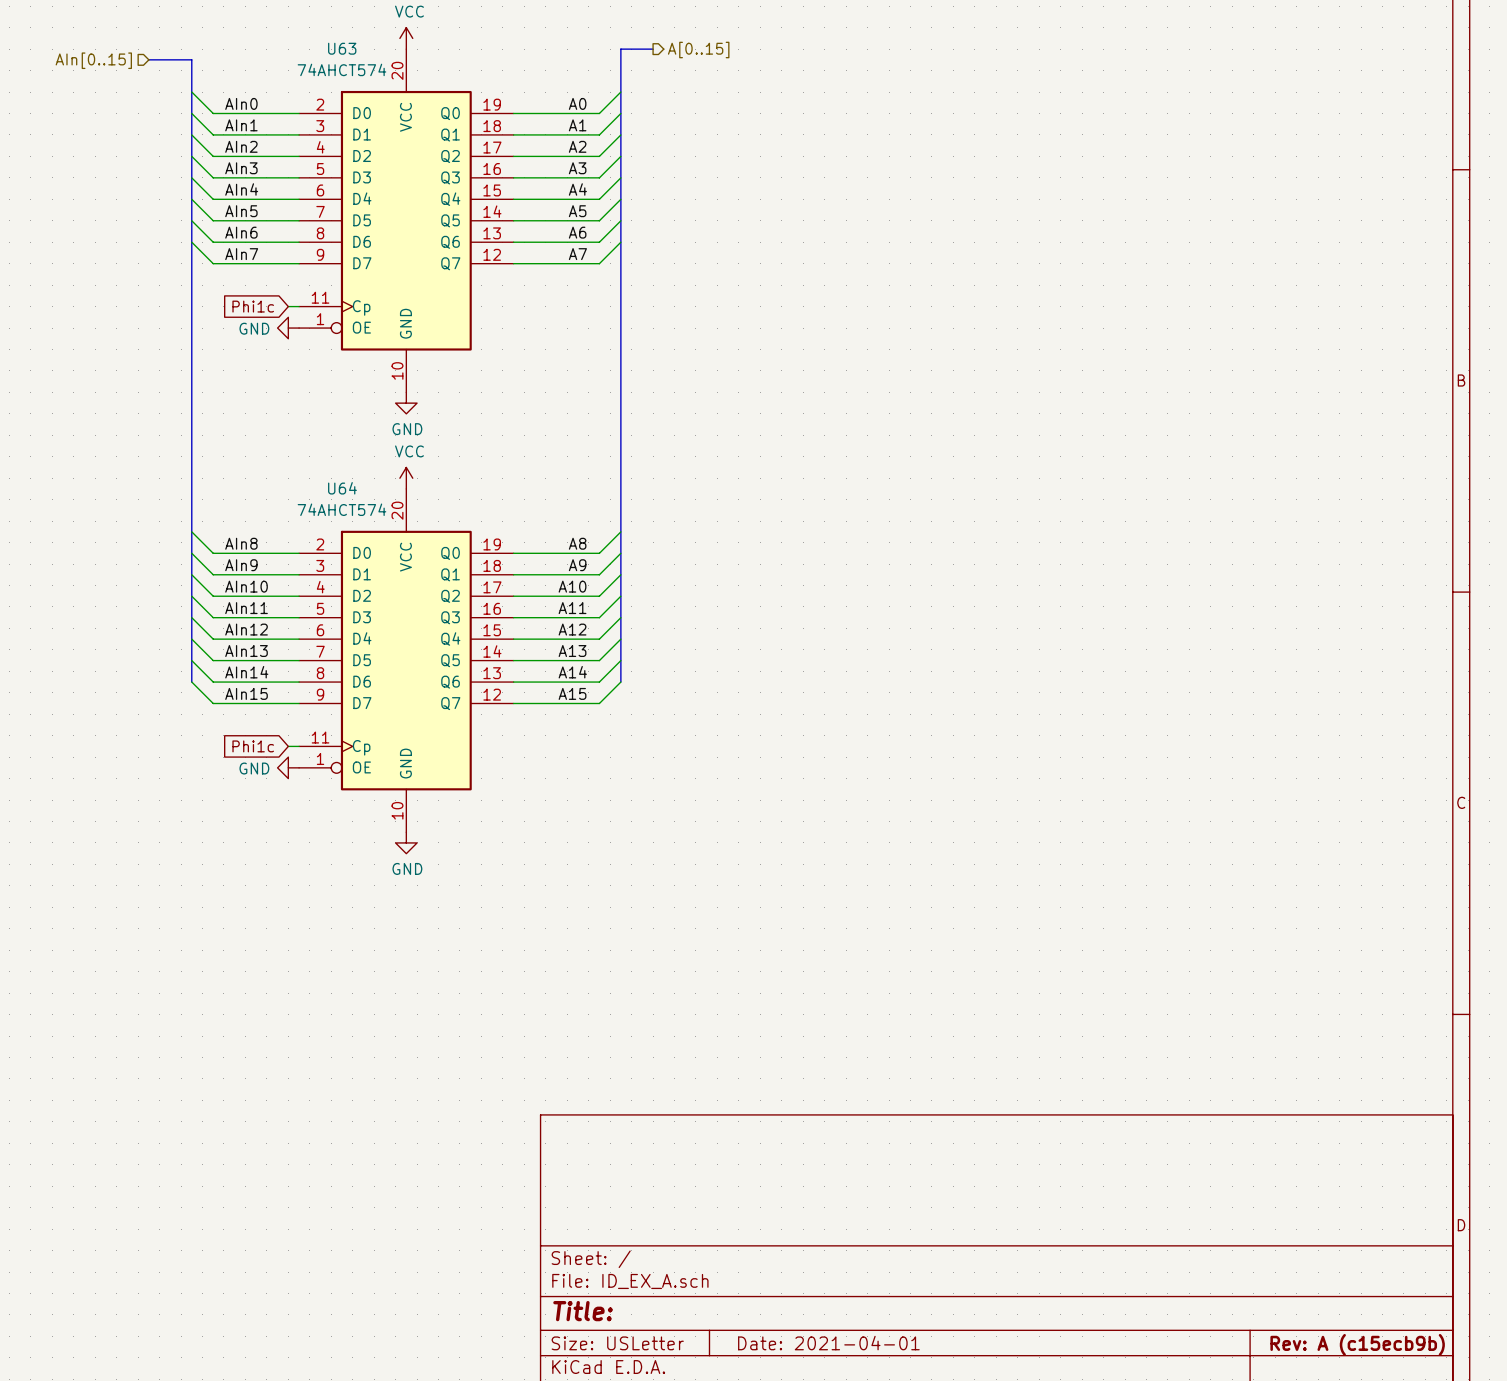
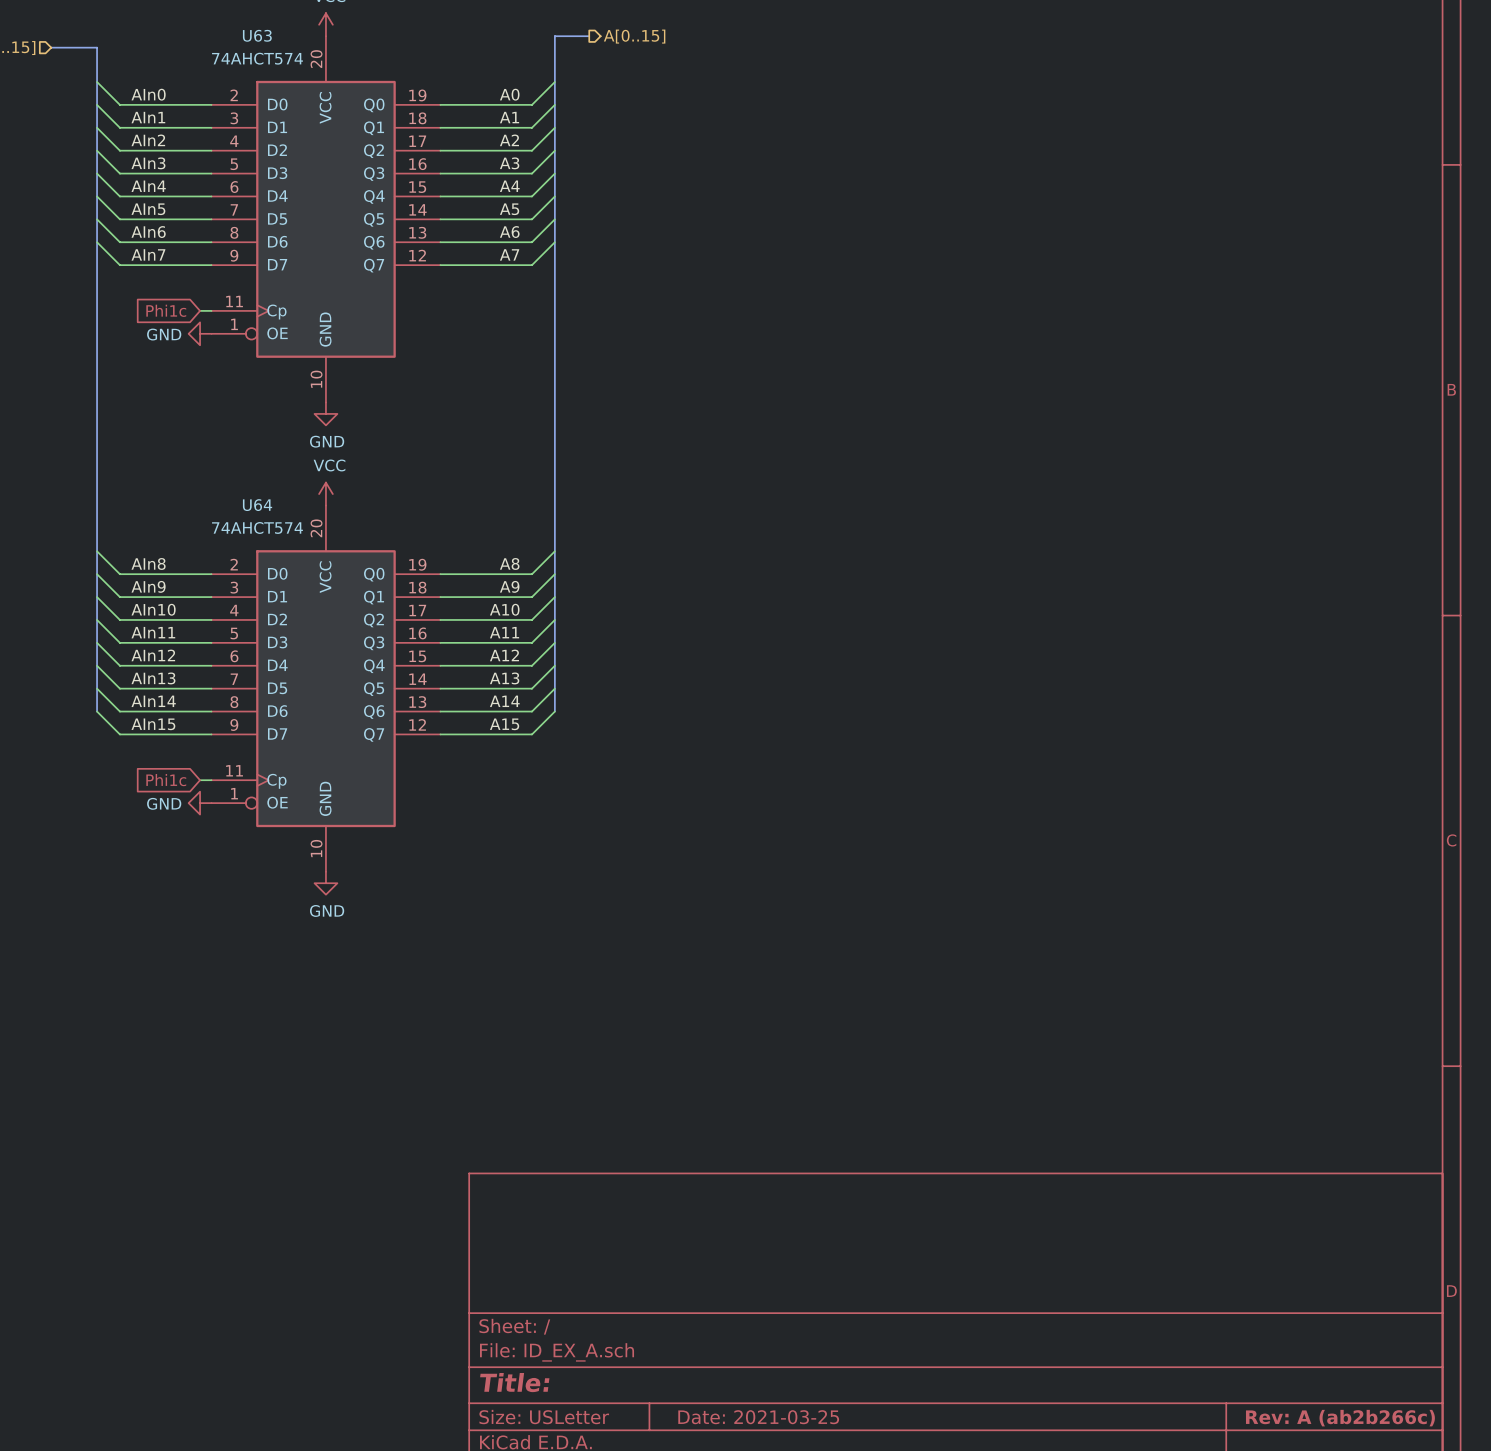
title block: Date: 2021-04-01 (828, 1343) -> Date: 2021-03-25 (758, 1417)
title block: Rev: A (c15ecb9b) (1357, 1344) -> Rev: A (ab2b266c) (1340, 1418)

